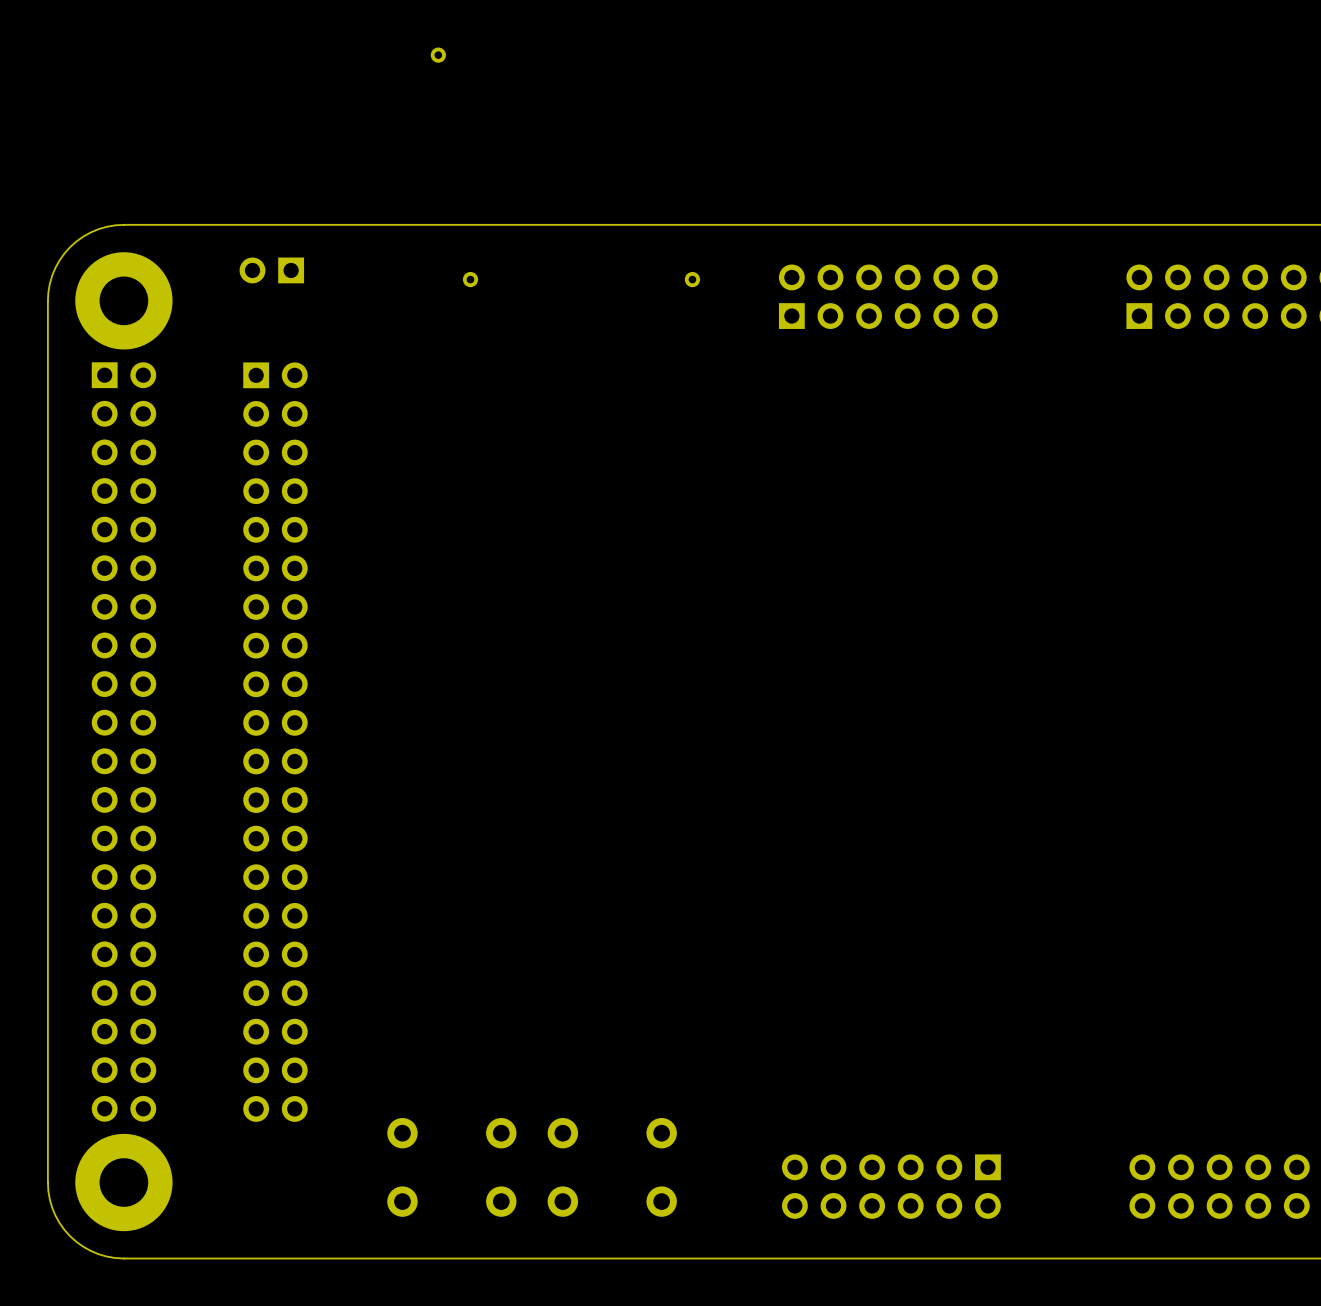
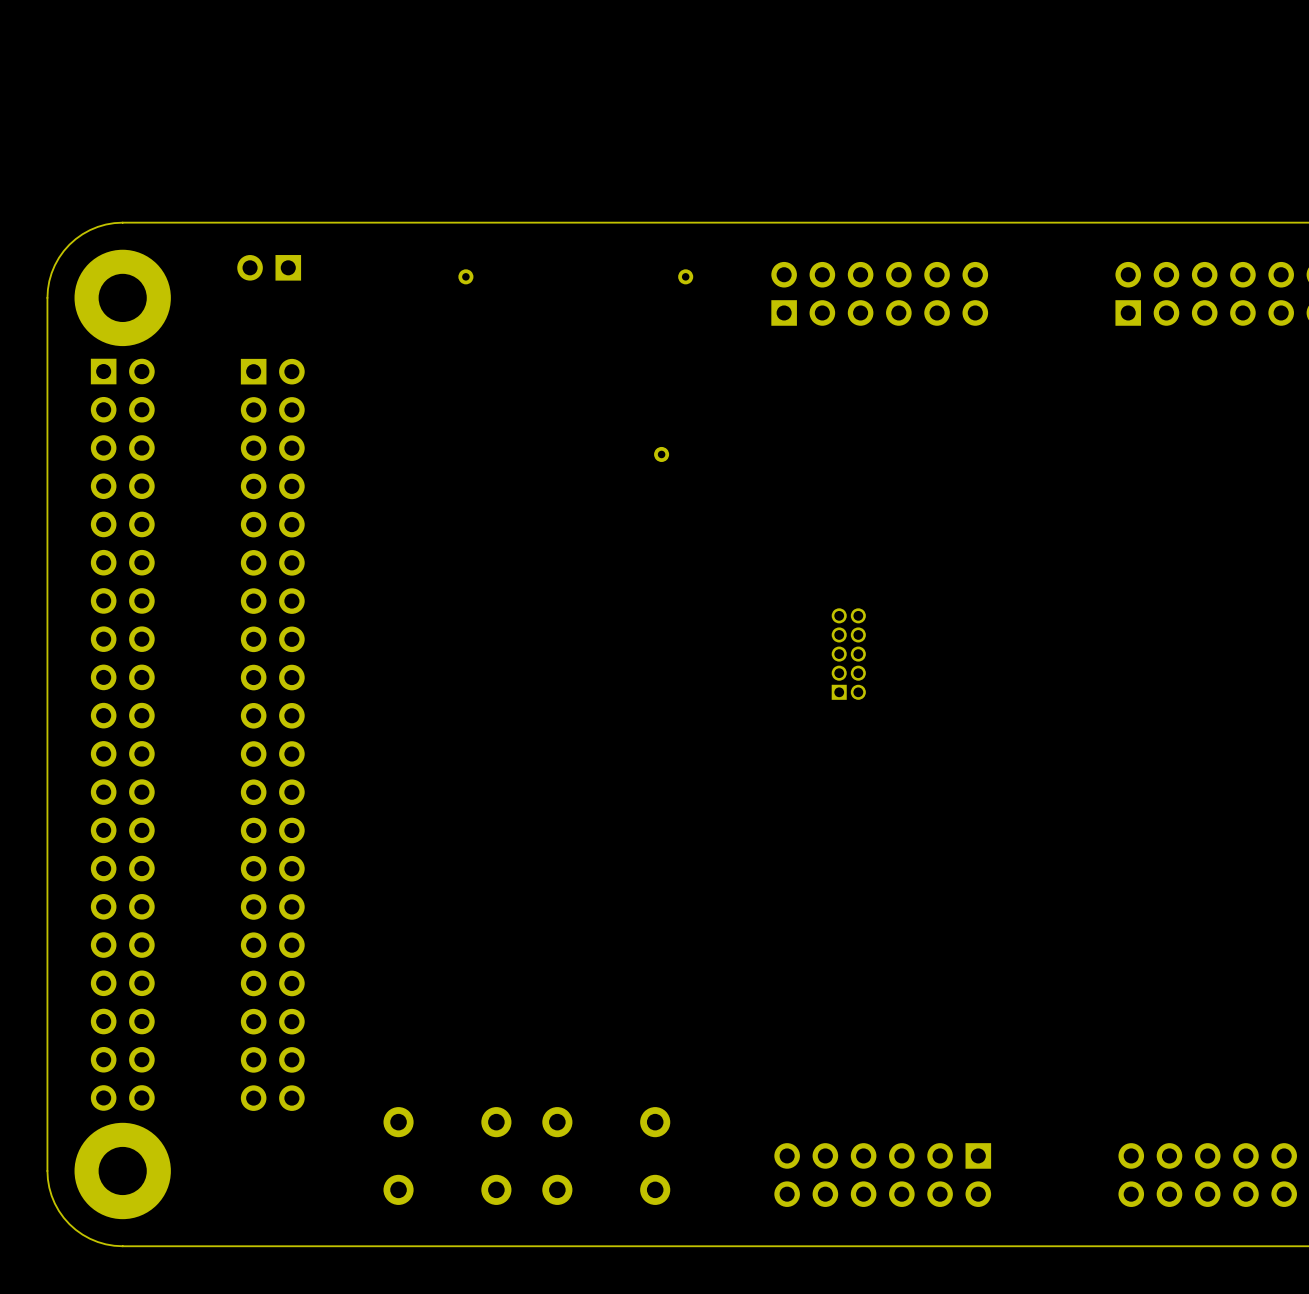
part: (438, 55) -> none
part: none -> (661, 454)
part: none -> (848, 654)

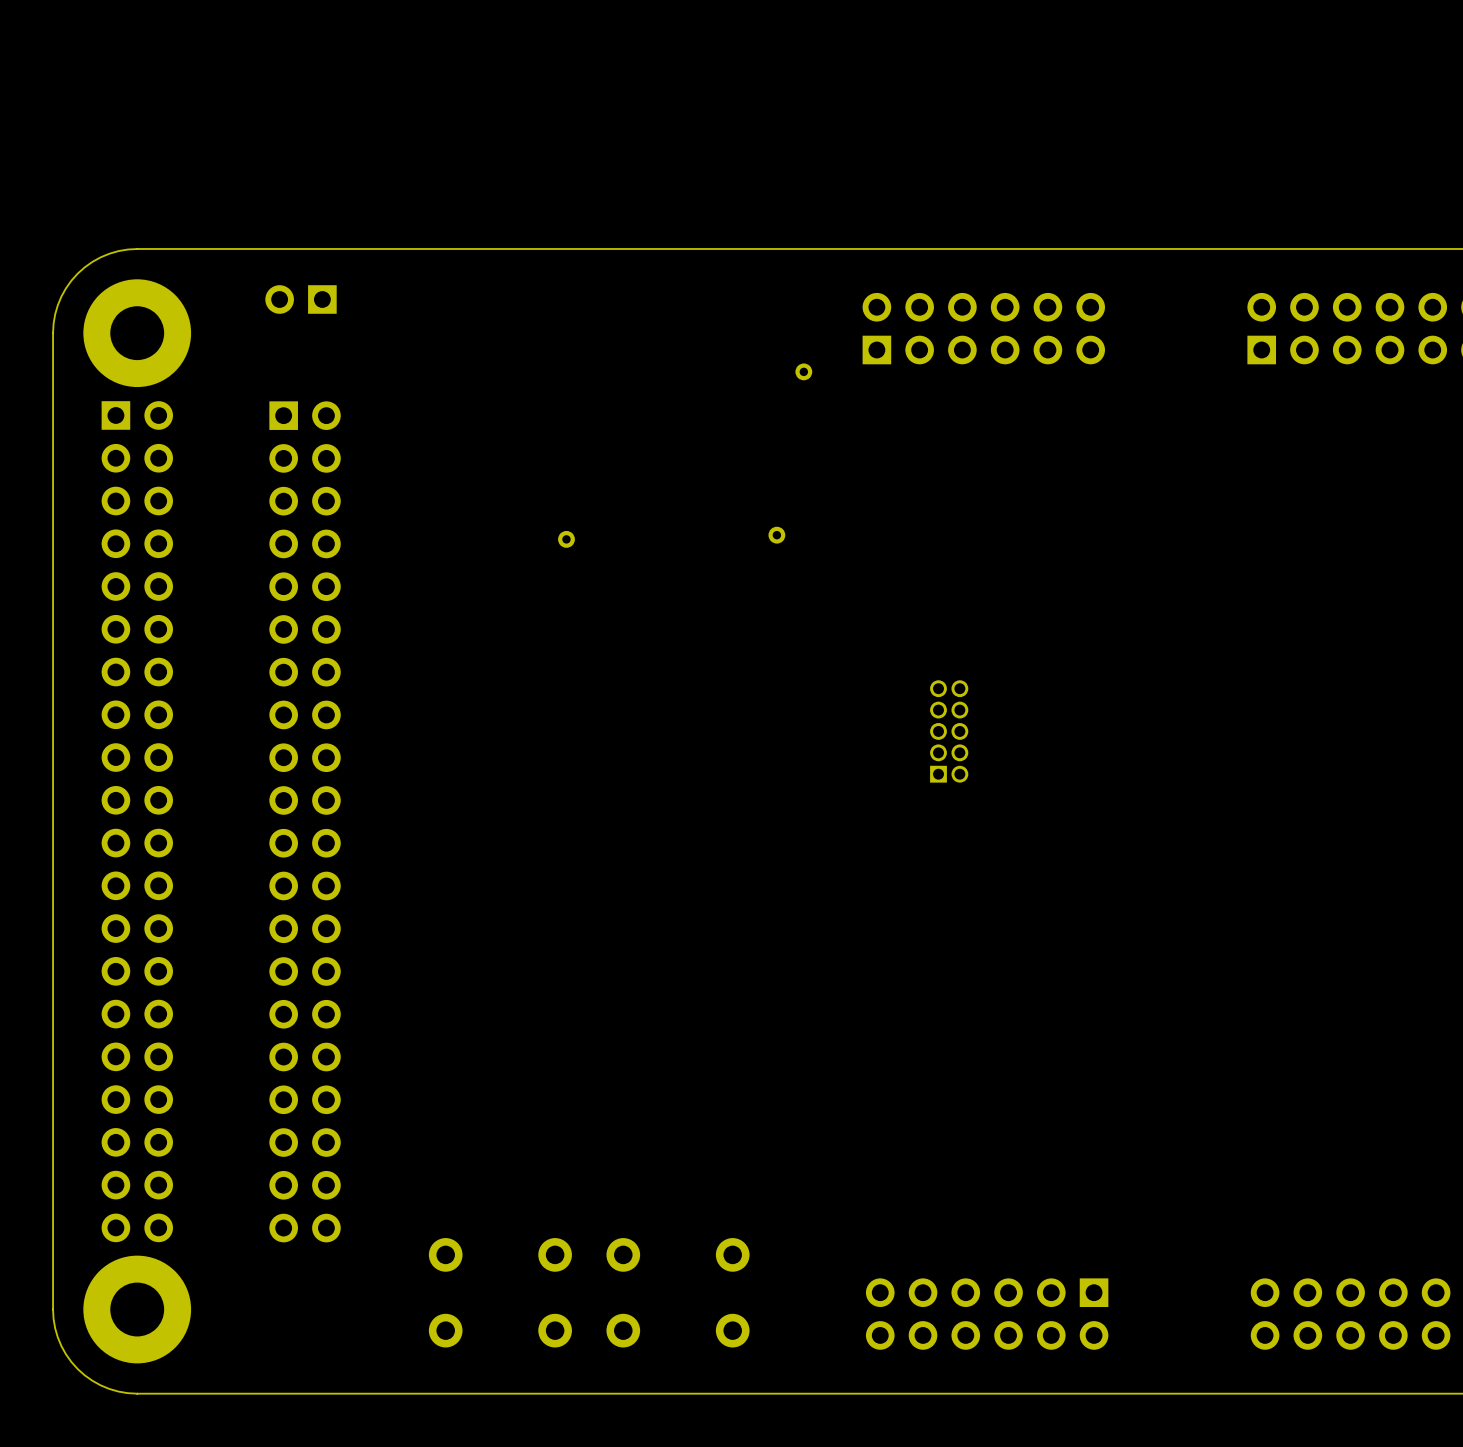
part: (465, 276) -> none
part position: (685, 276) -> (803, 371)
part position: (661, 454) -> (776, 535)
part: none -> (566, 539)

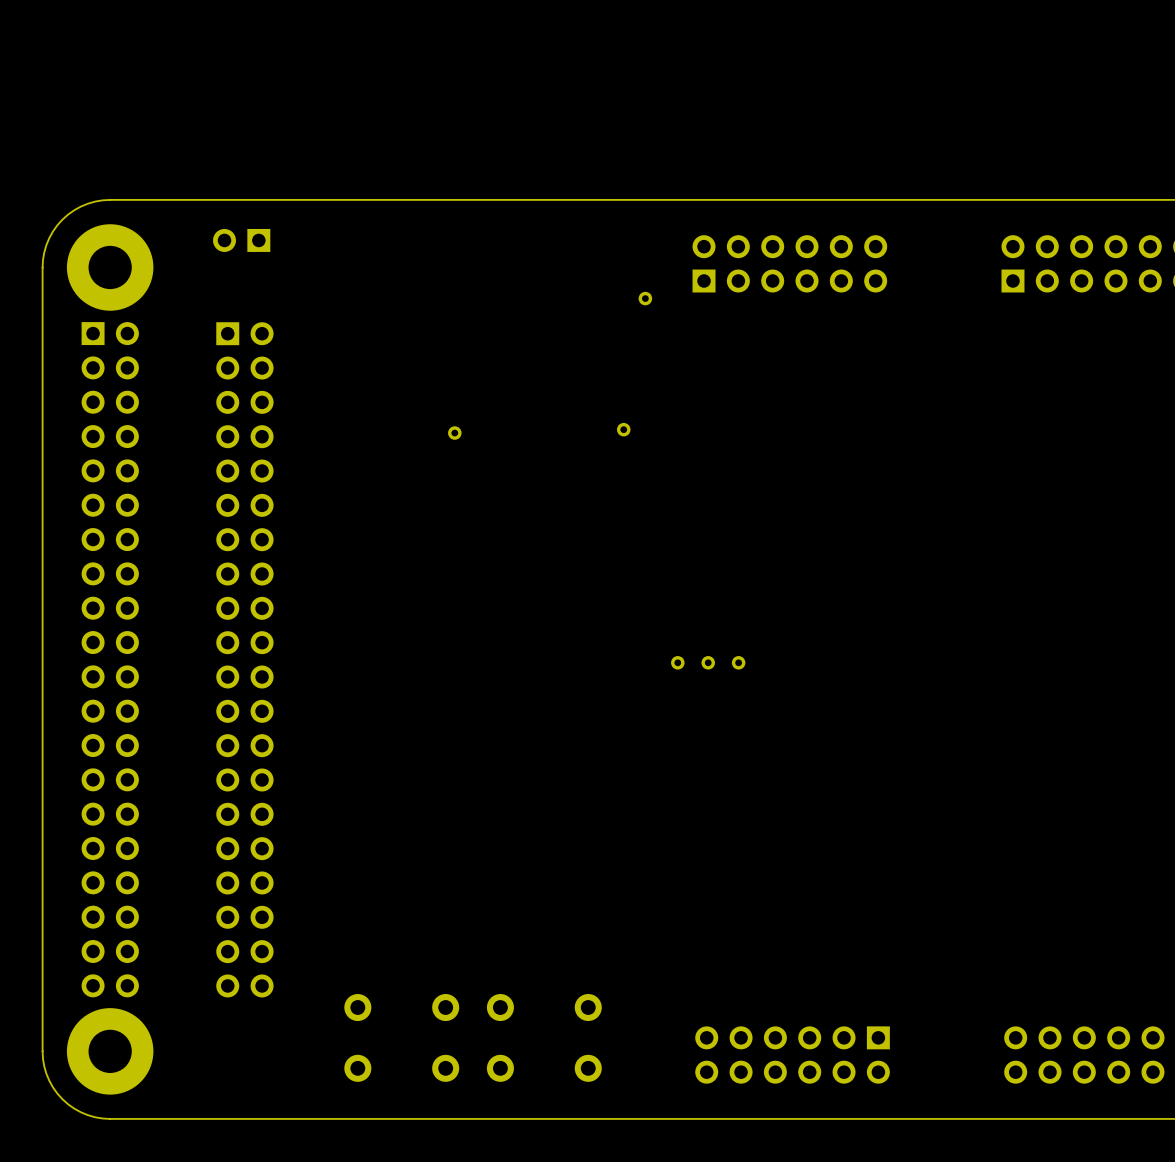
part: (949, 731) -> none
part: none -> (677, 662)
part: none -> (708, 662)
part: none -> (738, 662)

